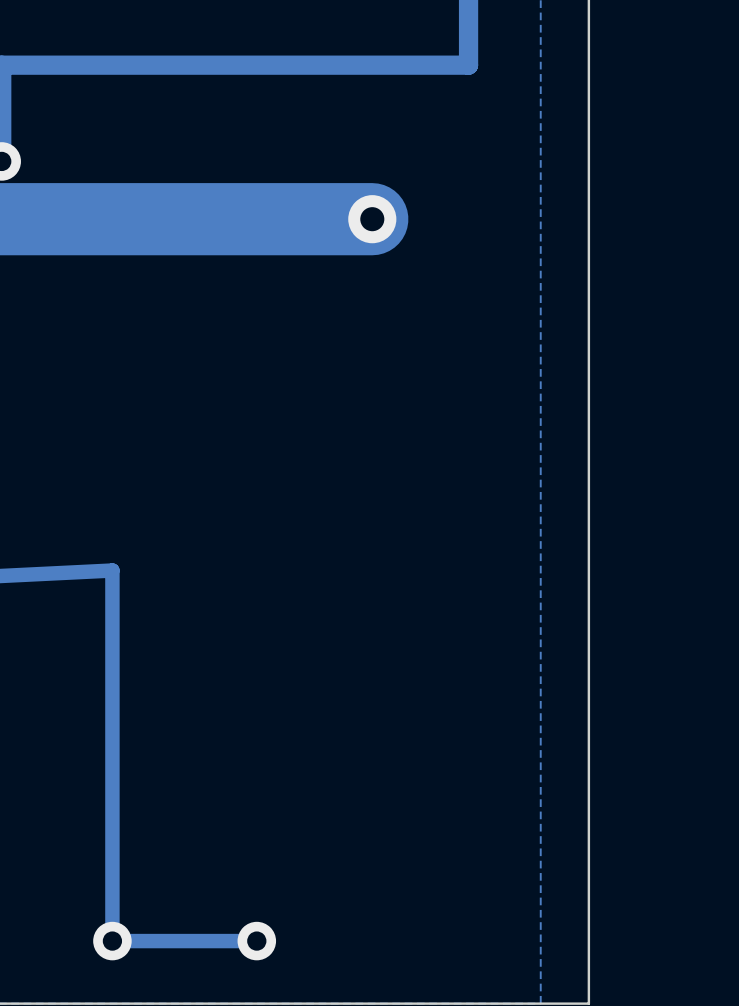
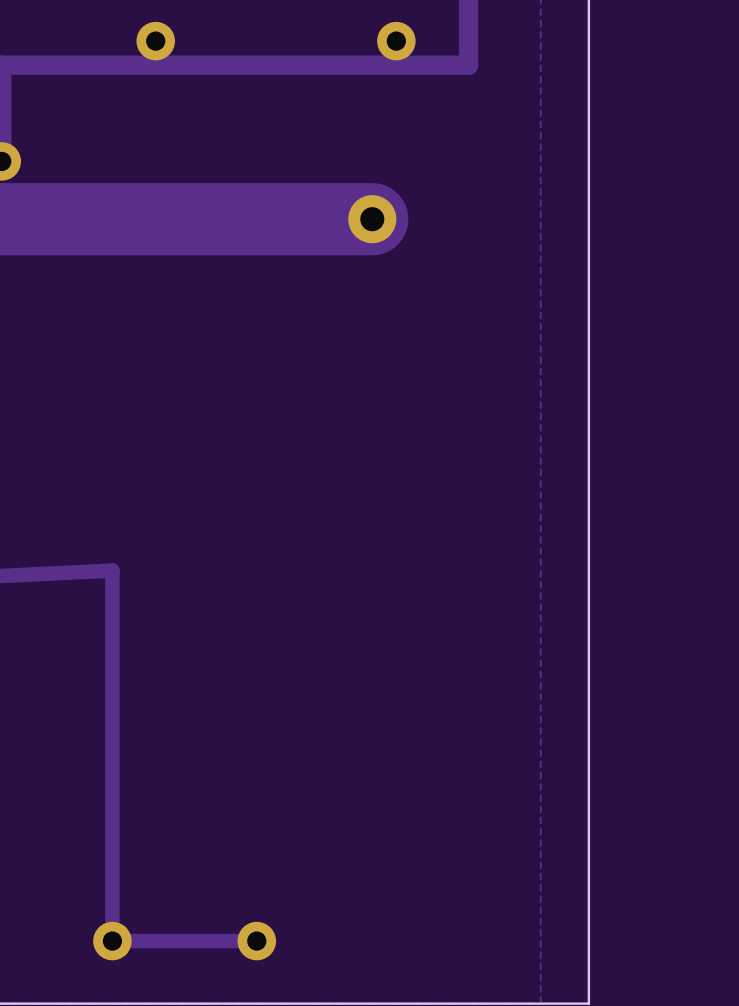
via: none -> (155, 41)
via: none -> (396, 41)

